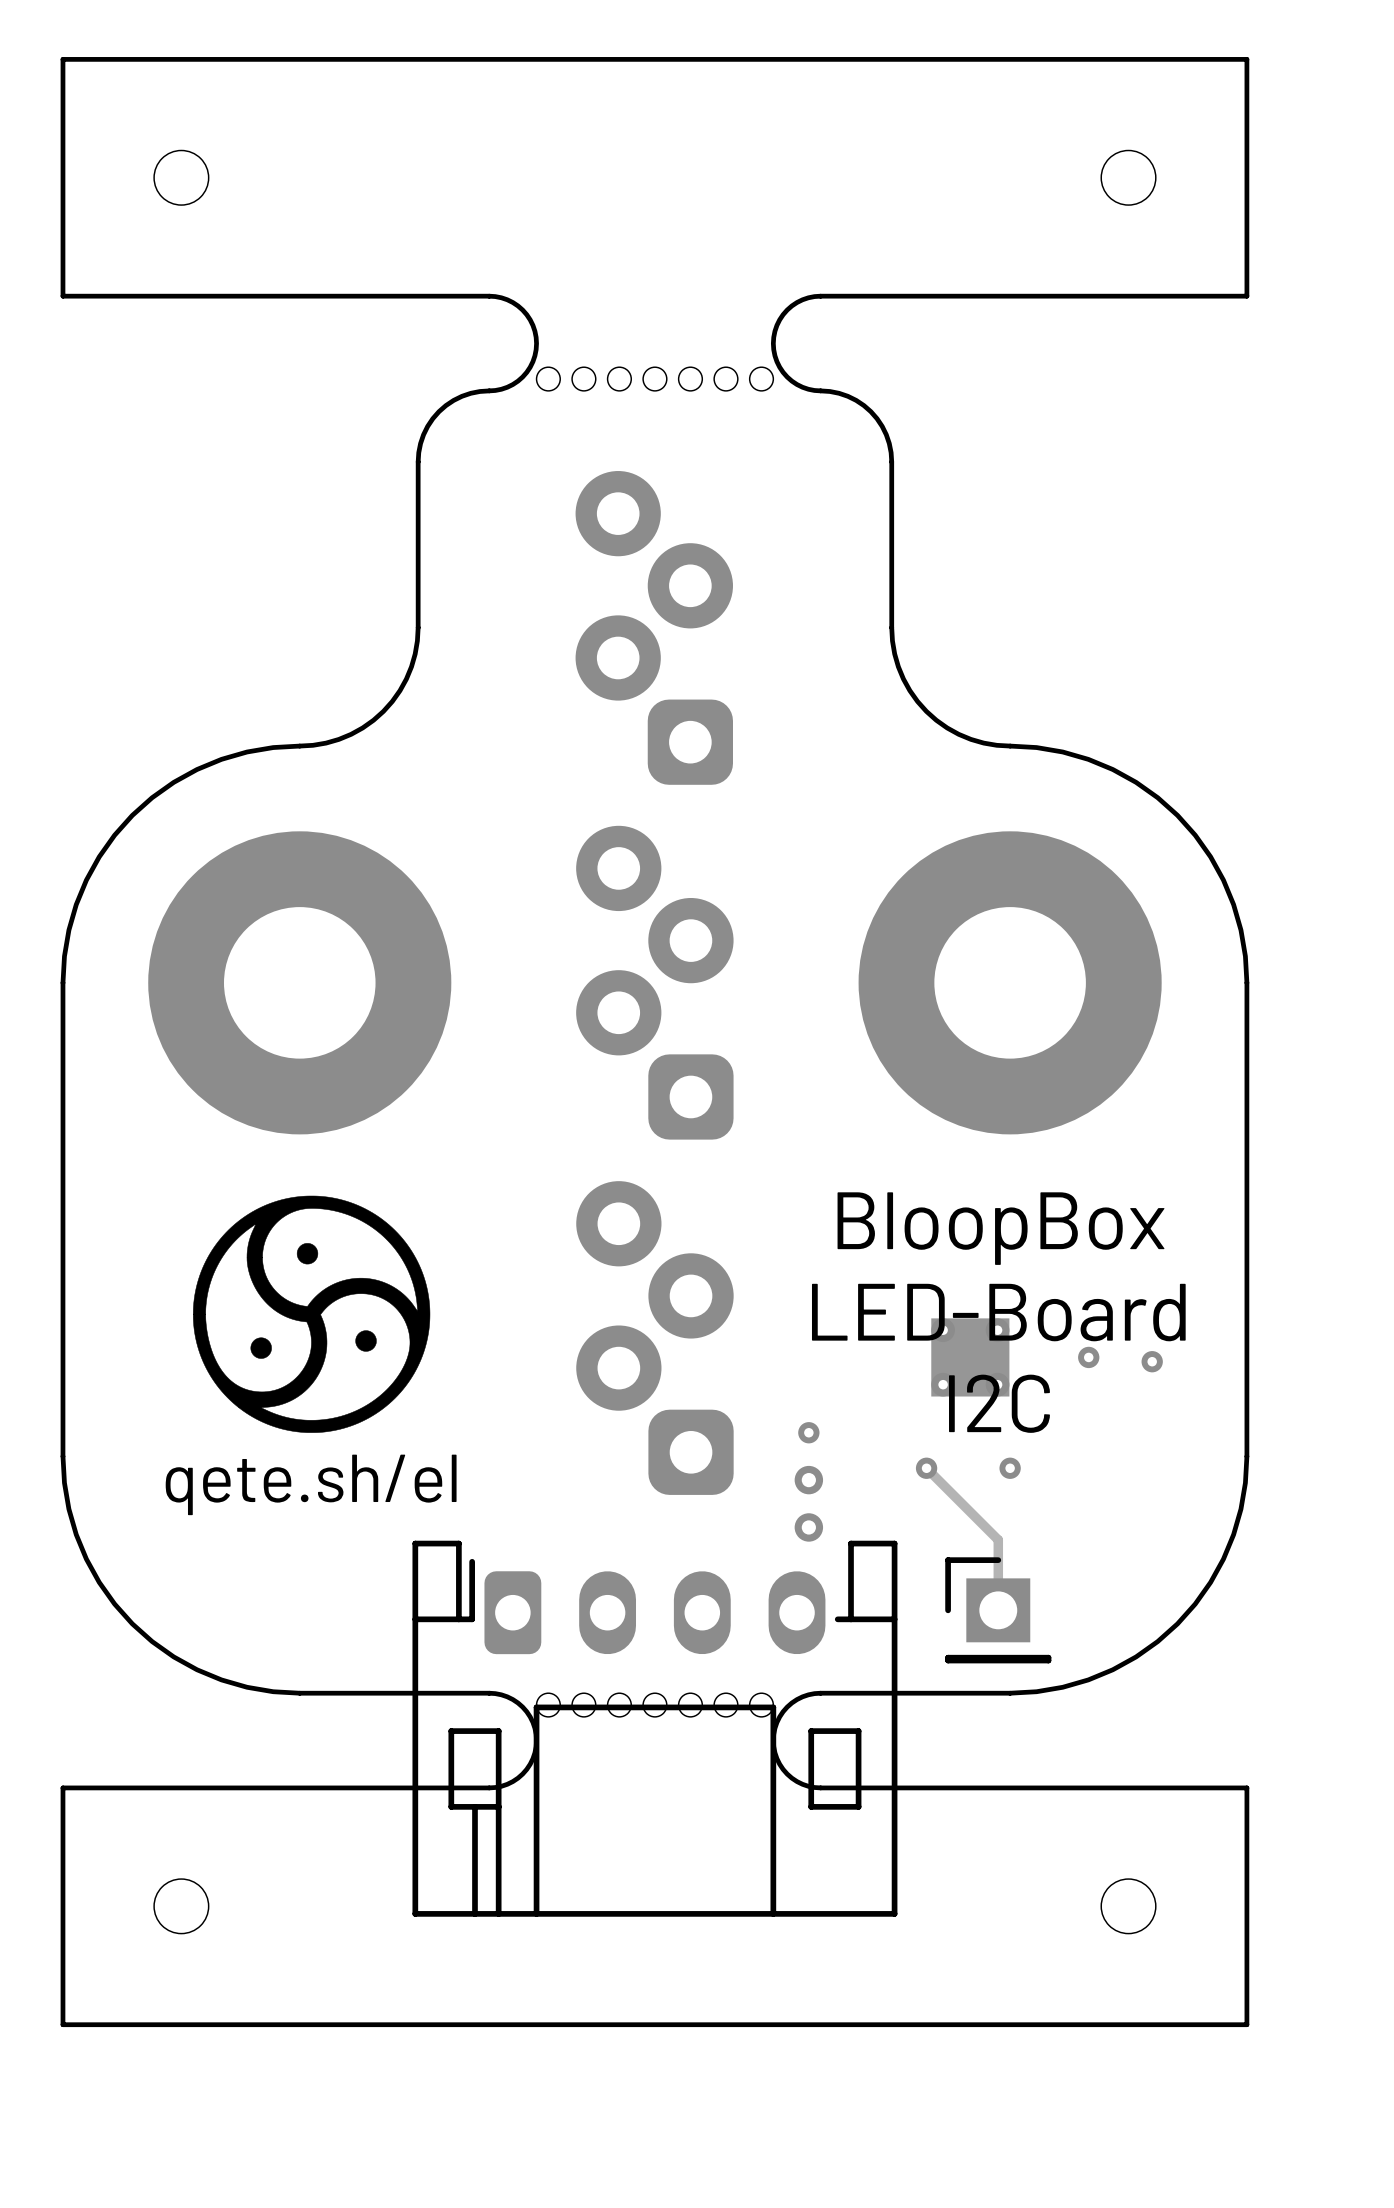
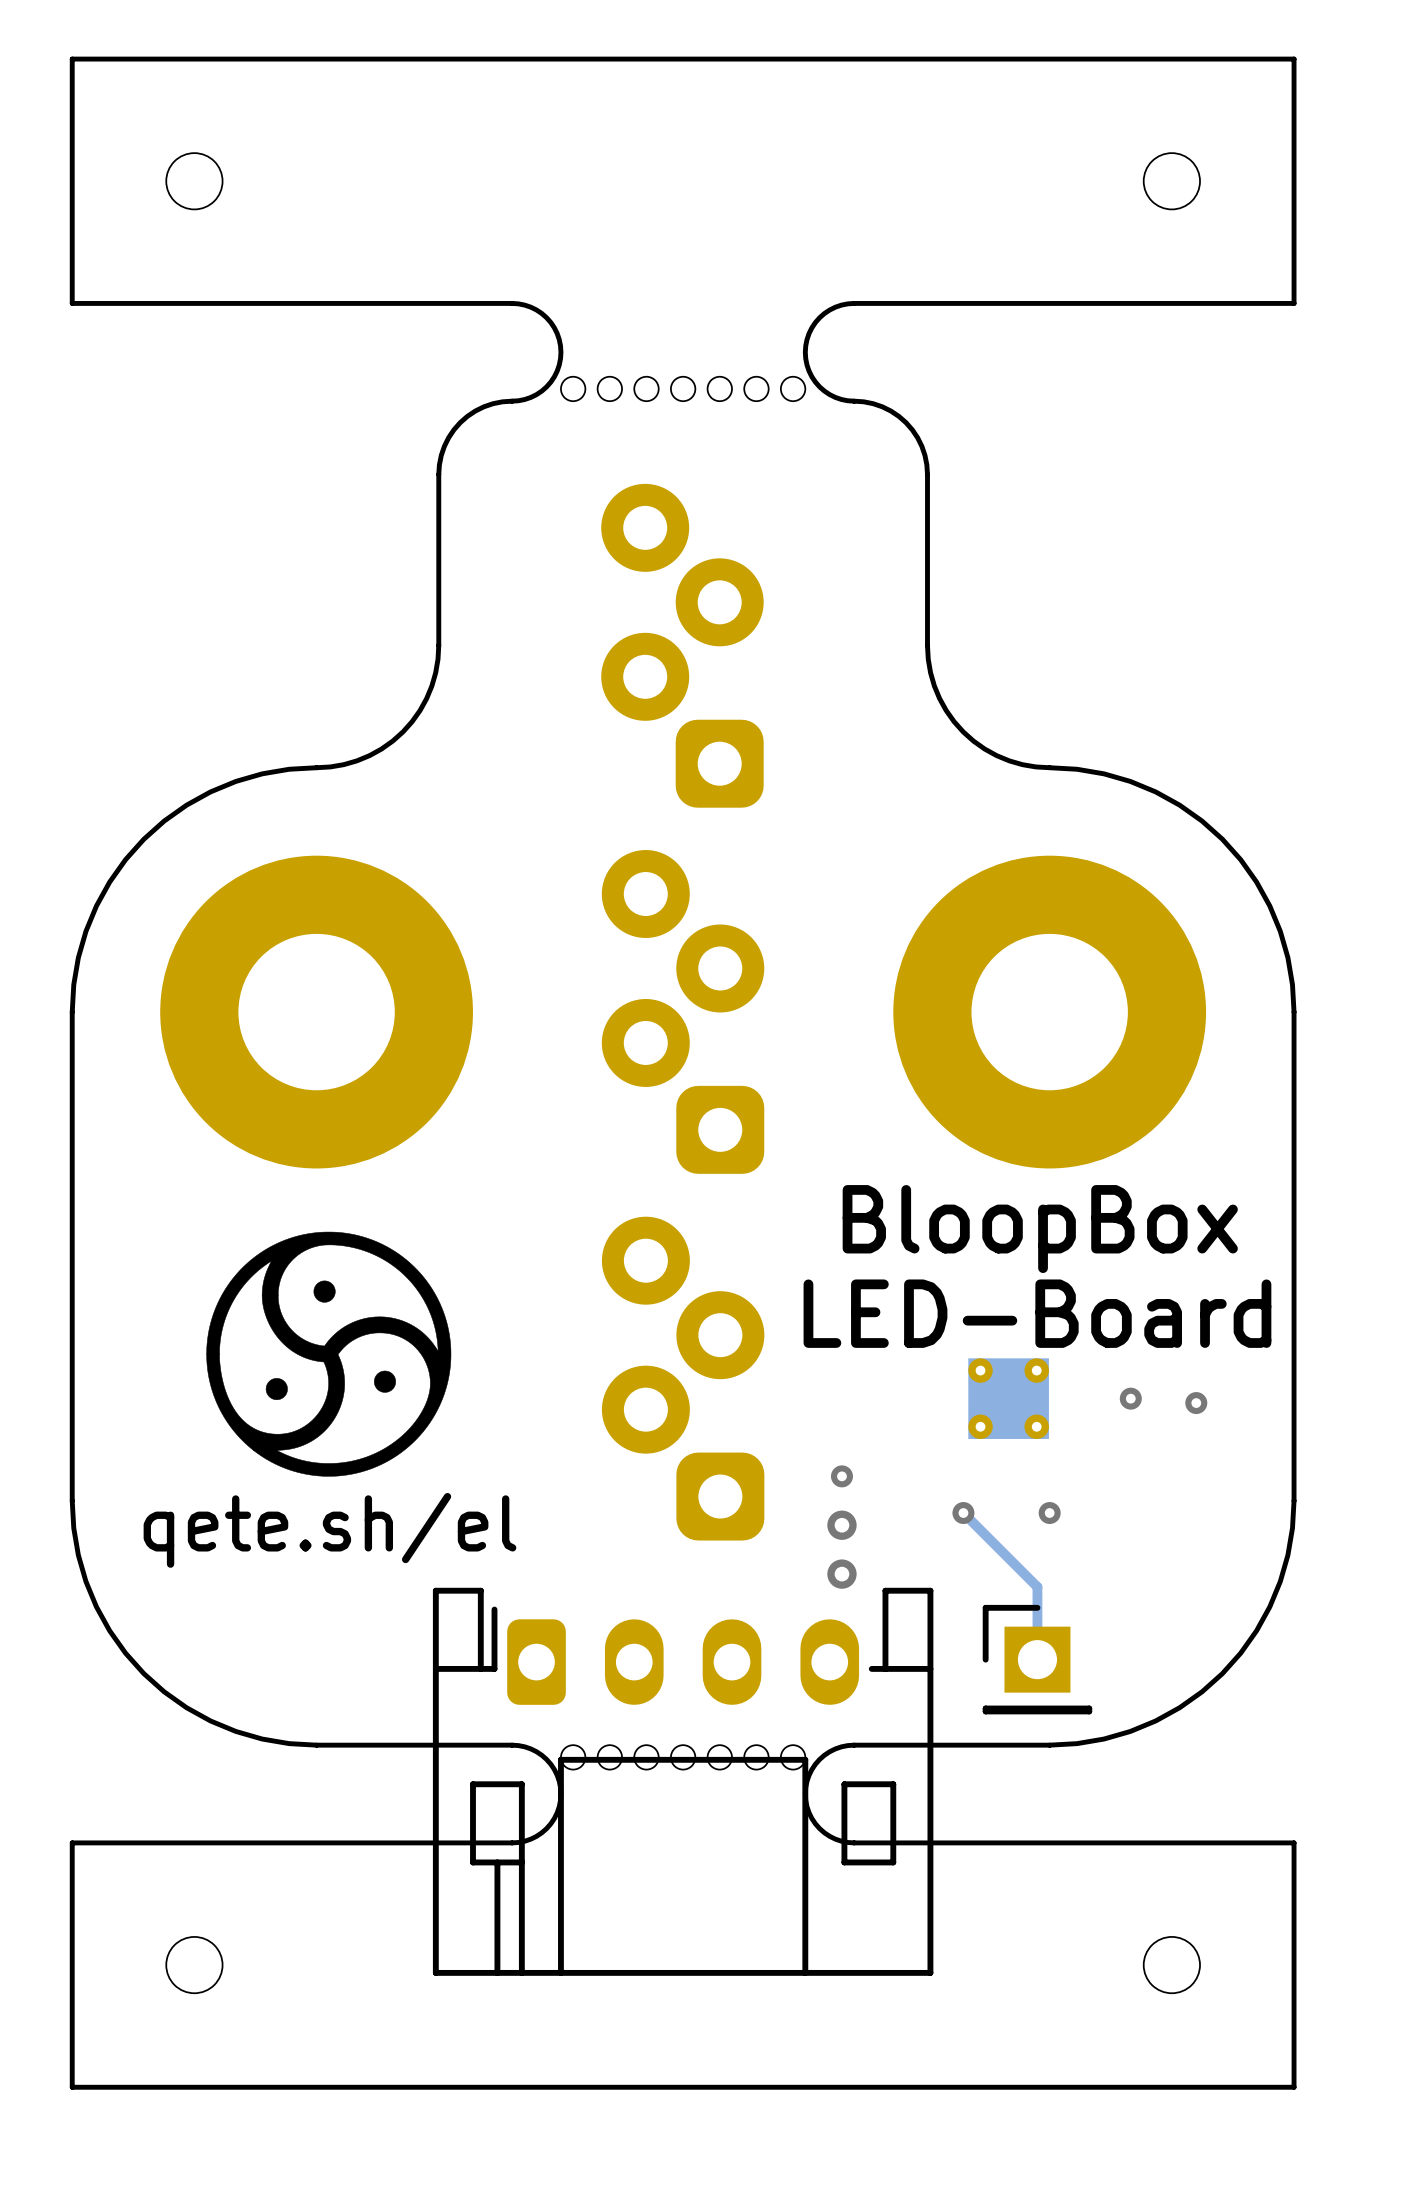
text position: BloopBox (1001, 1228) -> BloopBox (1040, 1229)
text position: LED-Board (998, 1312) -> LED-Board (1037, 1313)
text: I2C (999, 1403) -> none

